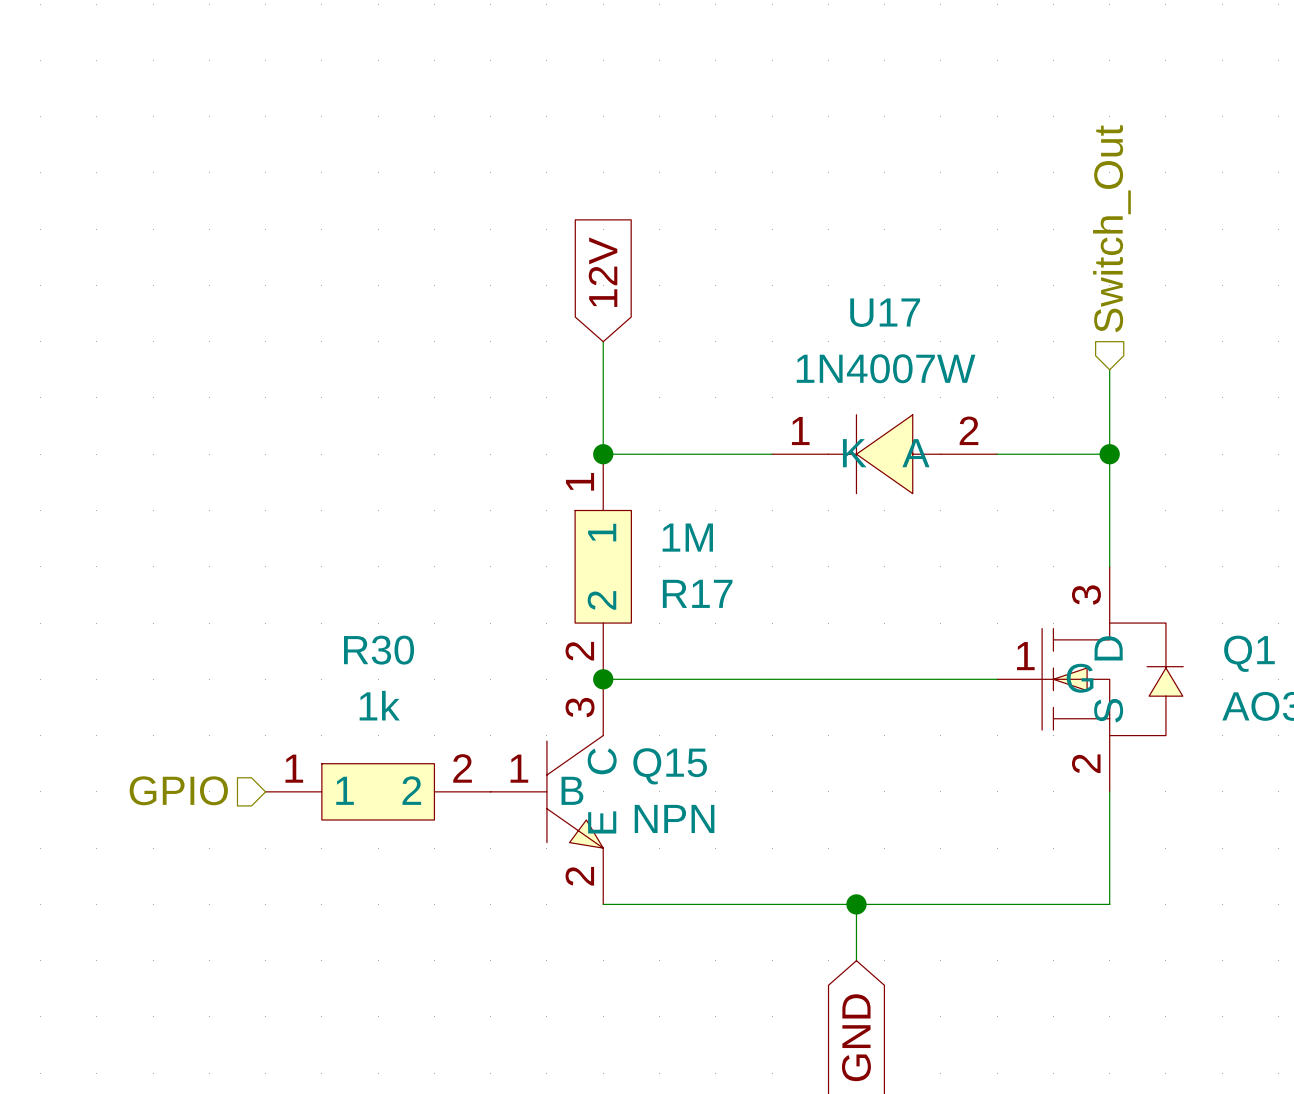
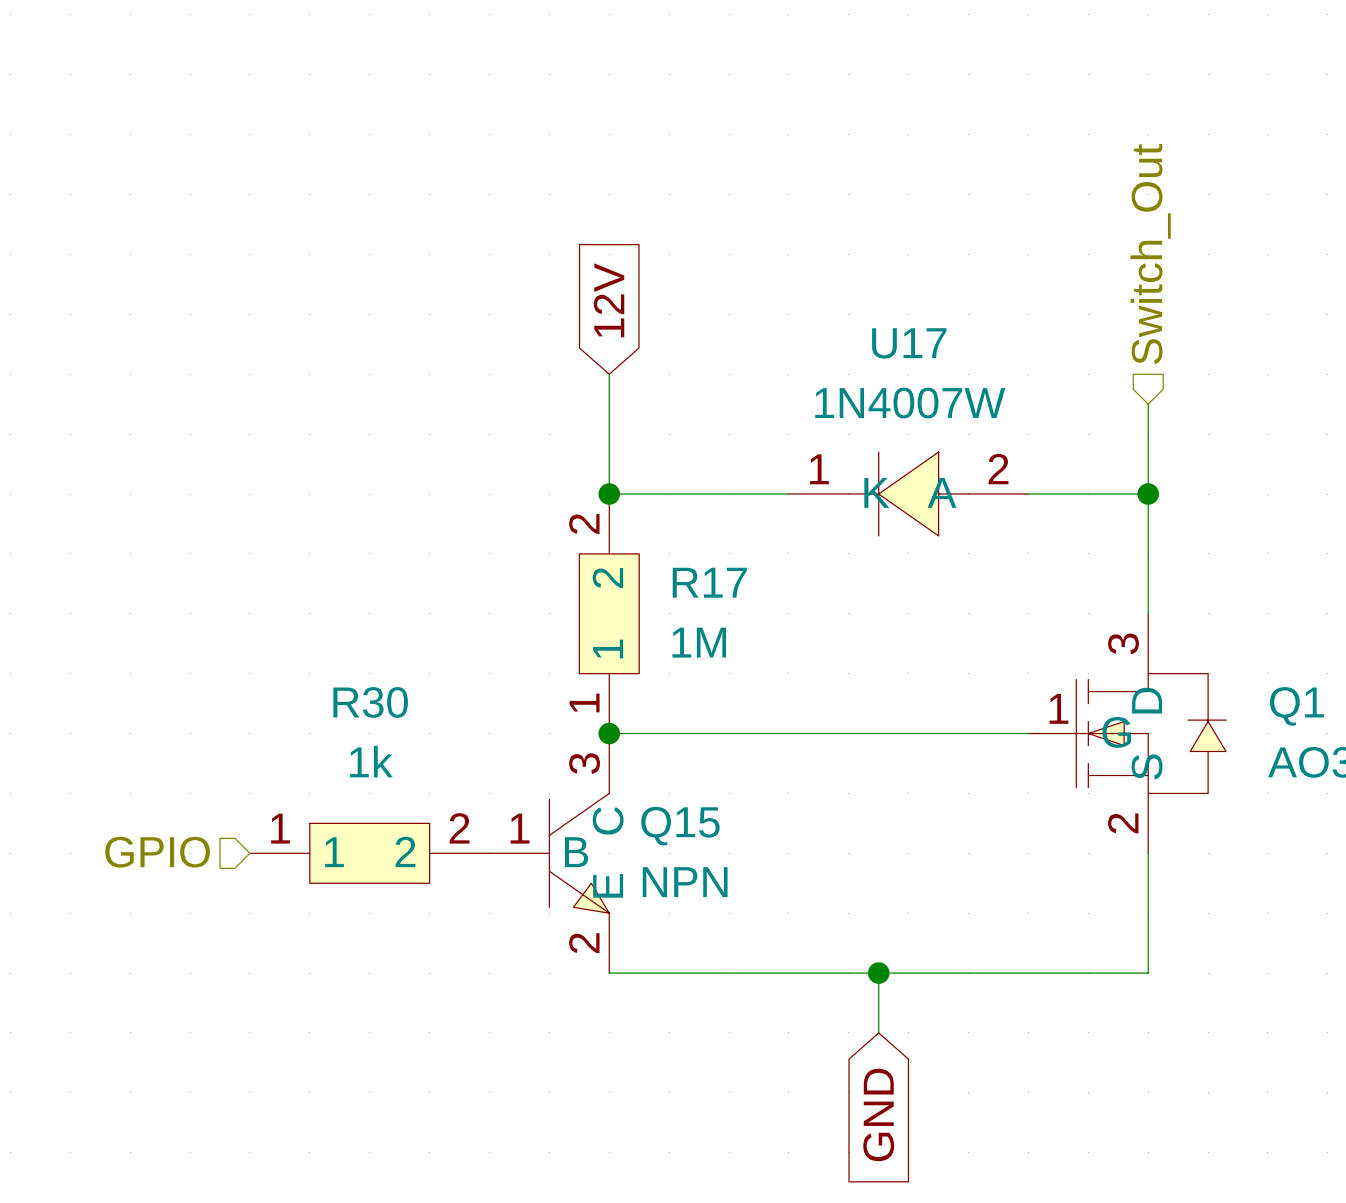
R17 value position: 1M (687, 537) -> 1M (699, 642)
R17 rotation: 0° (603, 566) -> 180° (609, 613)
R17 name position: R17 (697, 593) -> R17 (709, 582)

